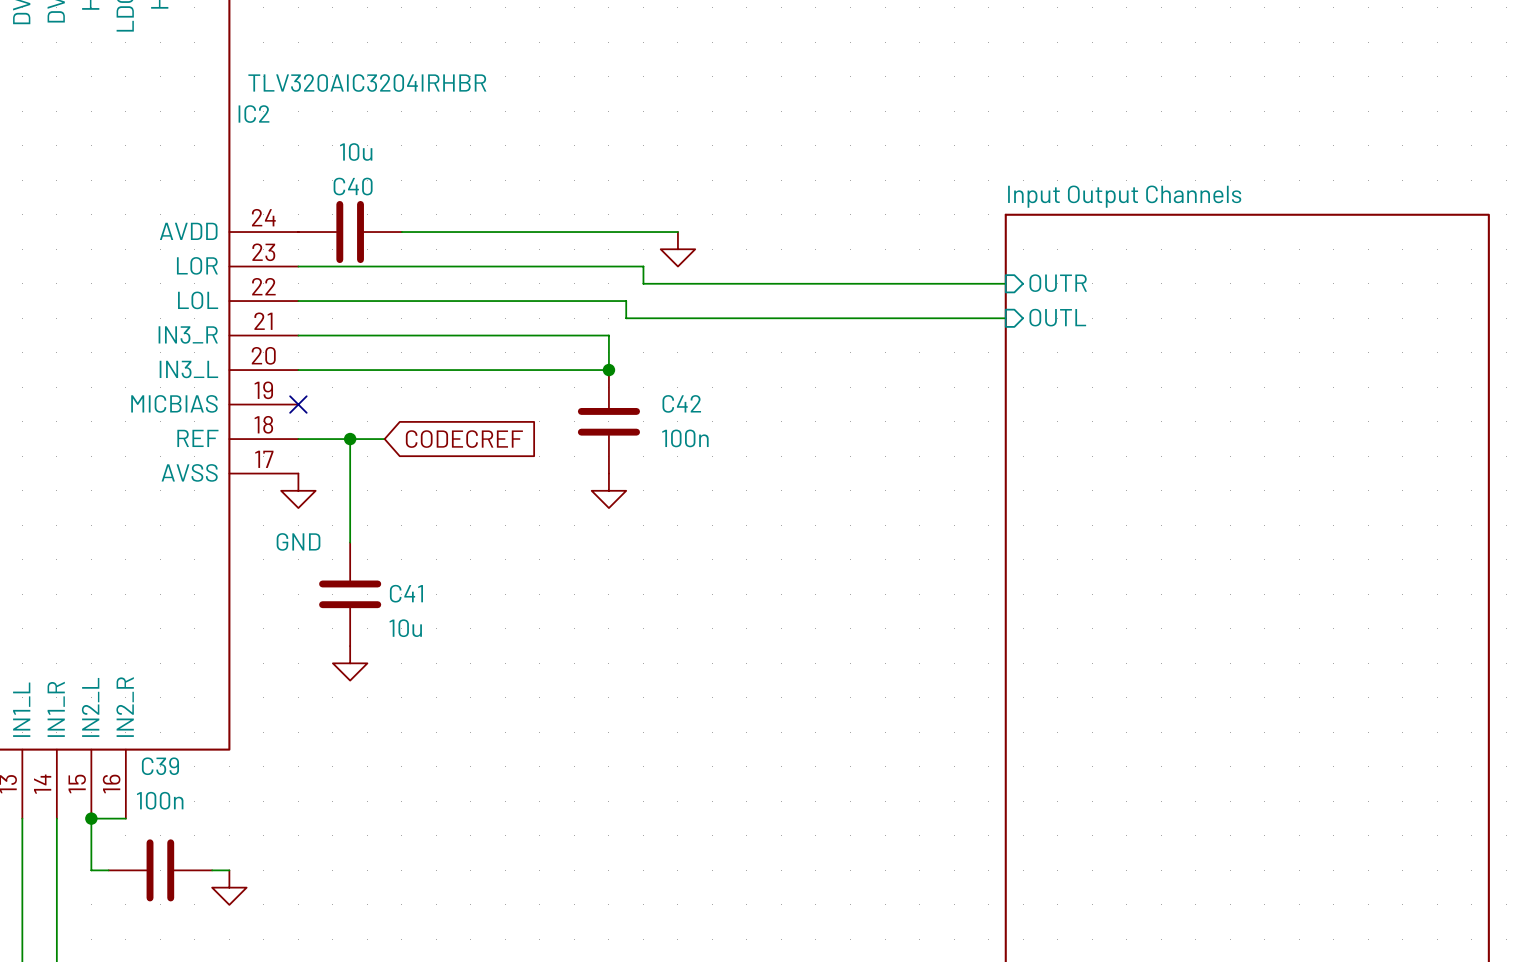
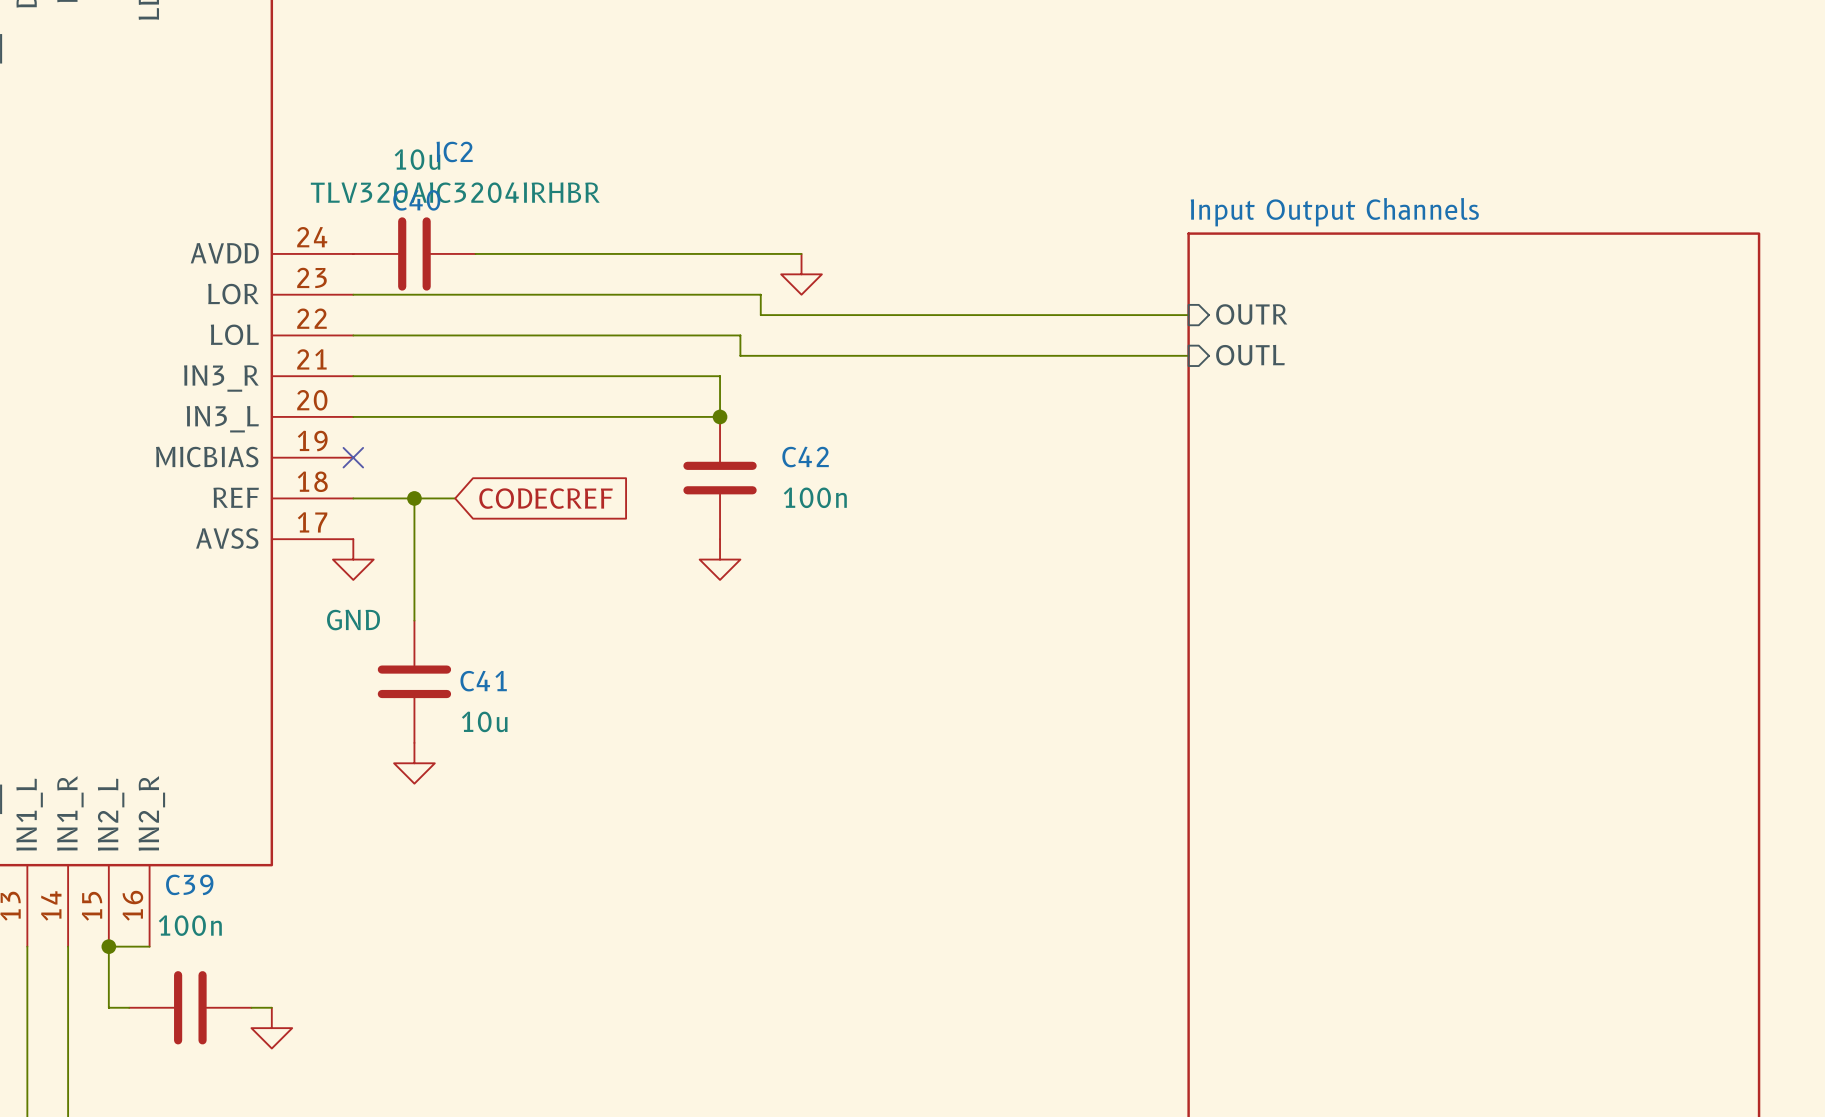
IC2 value position: TLV320AIC3204IRHBR (367, 83) -> TLV320AIC3204IRHBR (455, 192)
IC2 name position: IC2 (253, 114) -> IC2 (454, 151)

